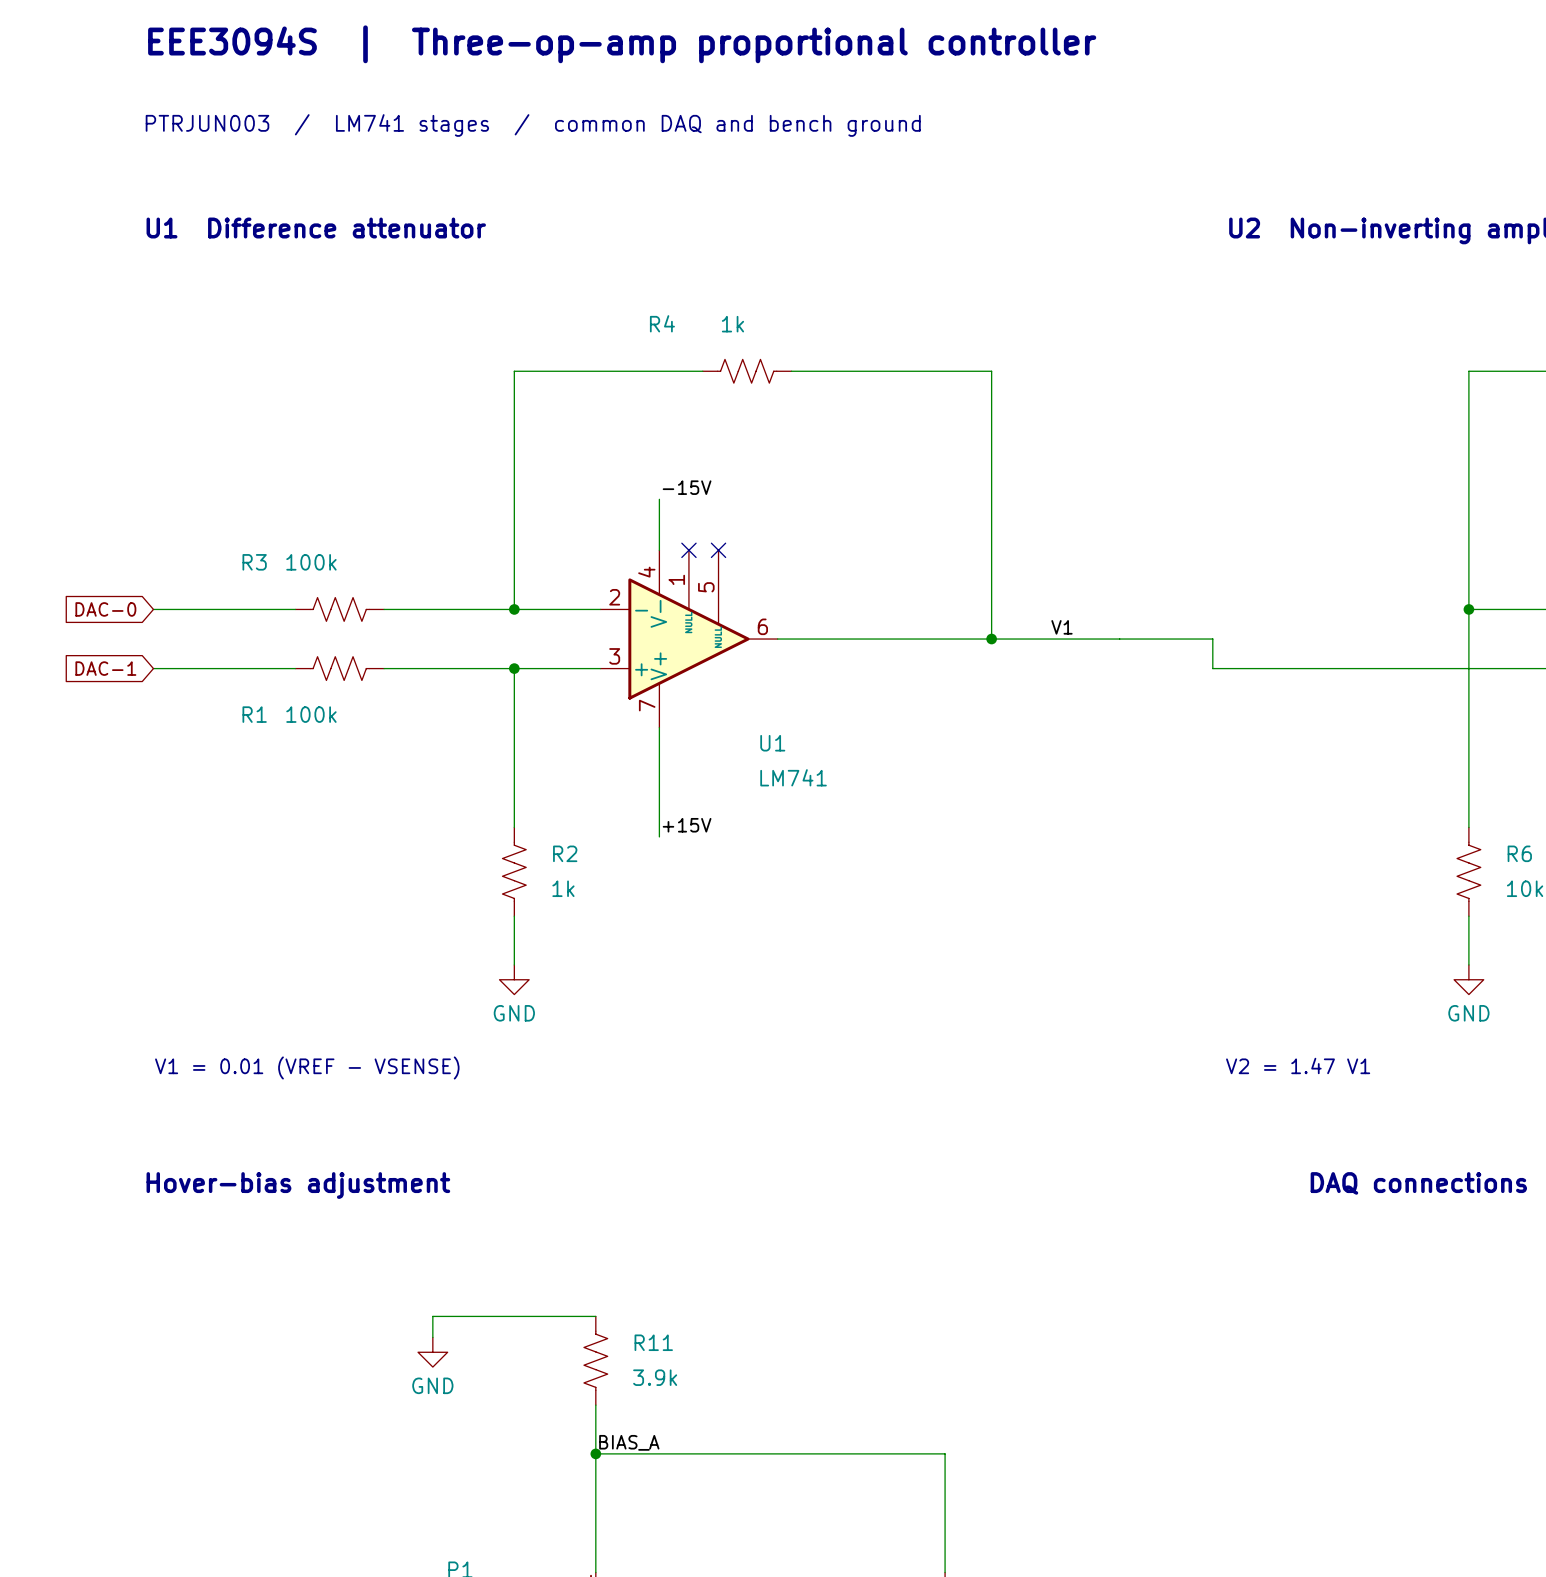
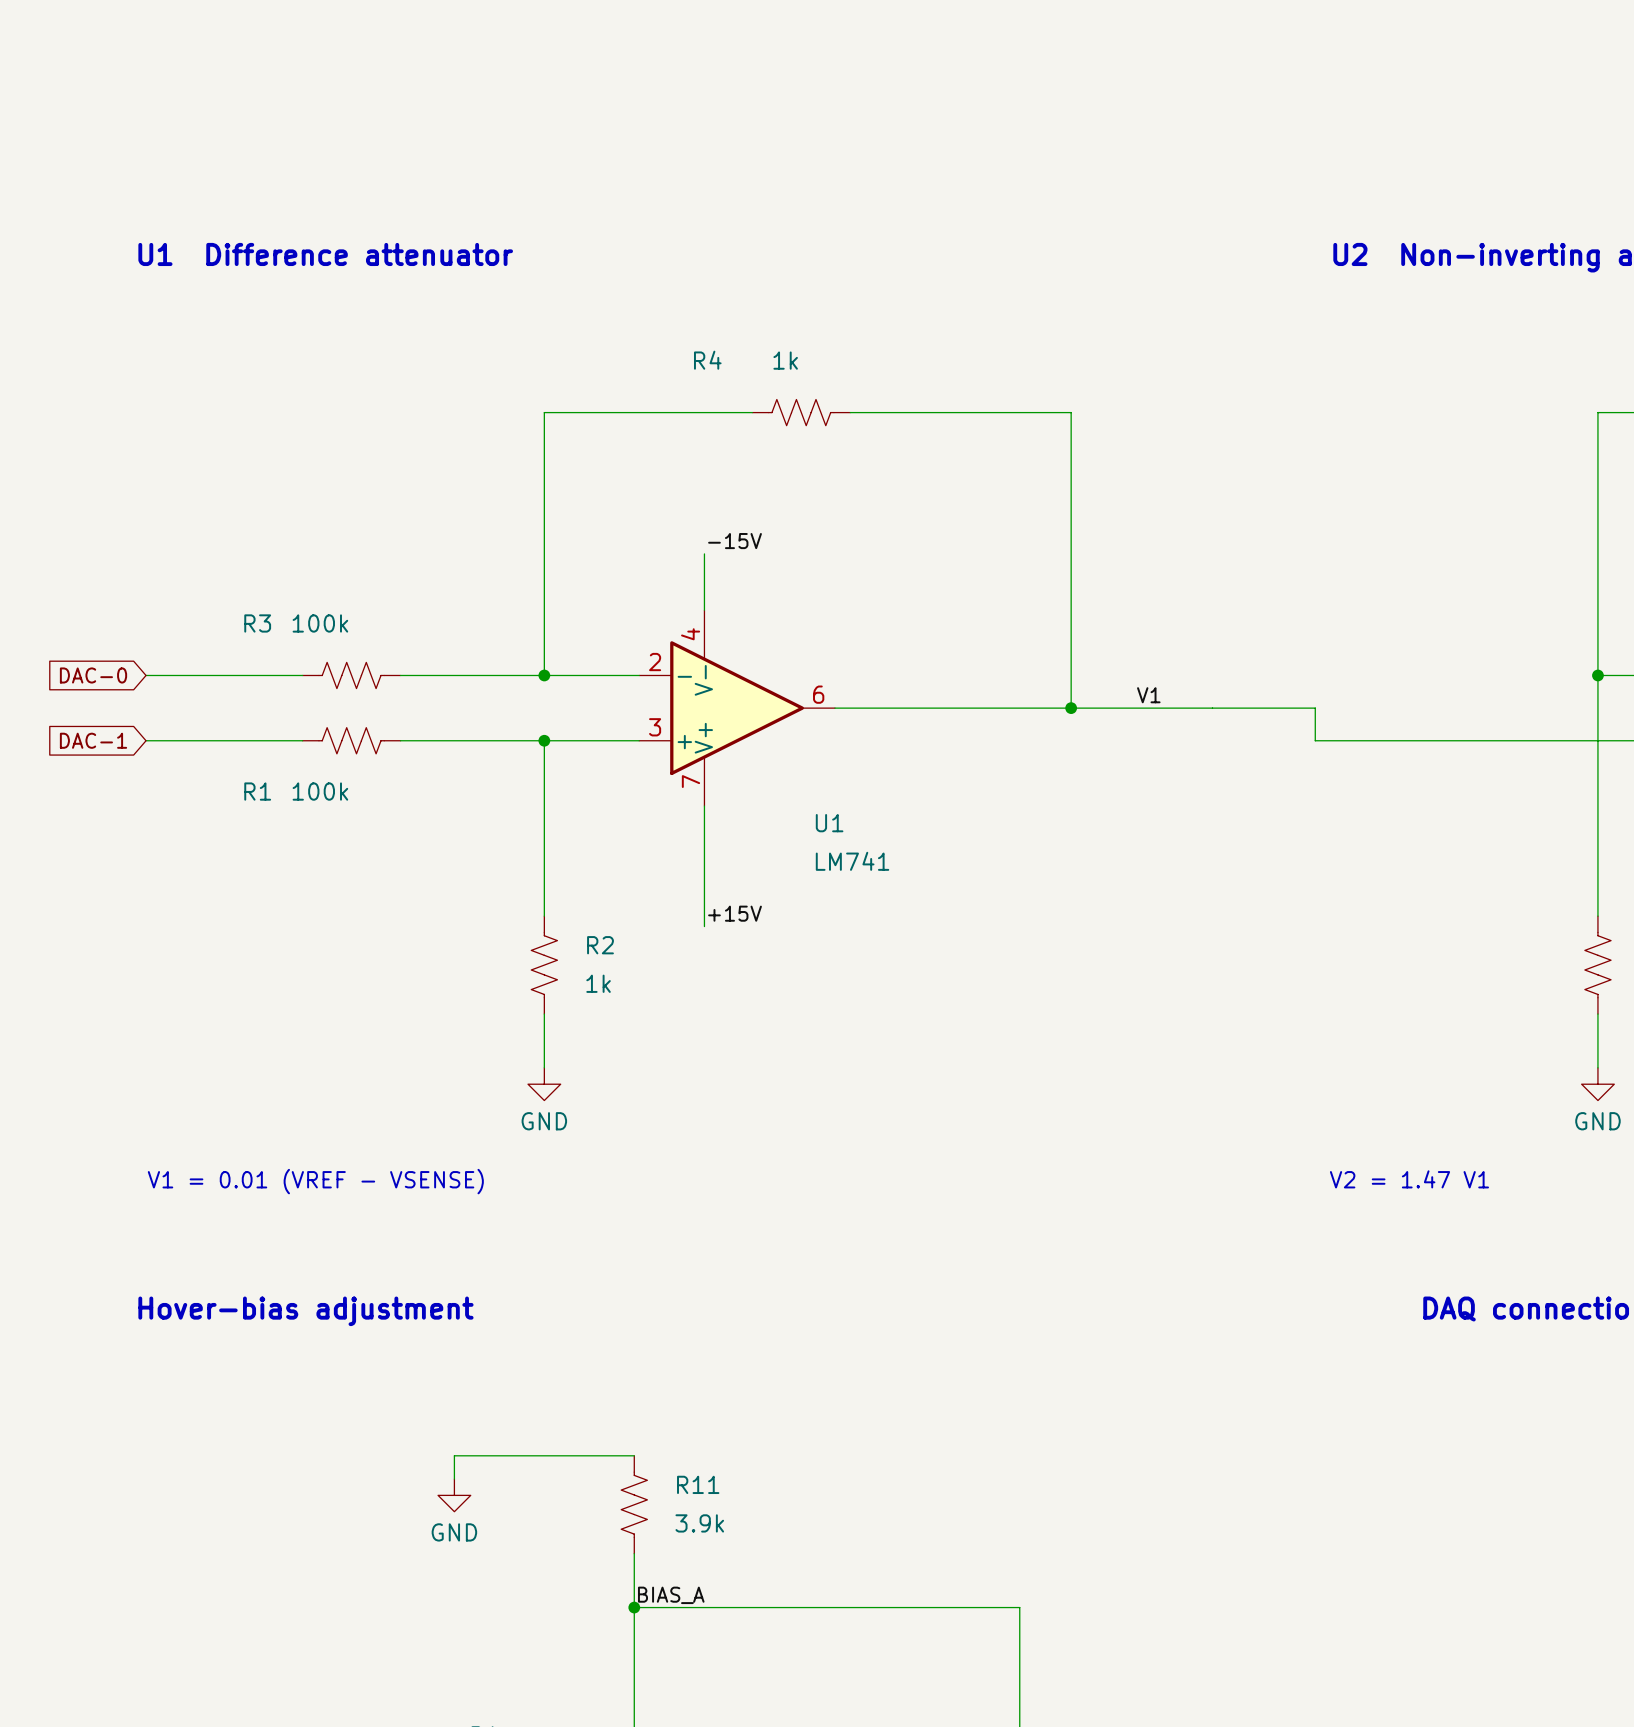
text: EEE3094S | Three-op-amp proportional controller (622, 44) -> none
text: PTRJUN003 / LM741 stages / common DAQ and bench ground (533, 125) -> none
U1 symbol: [600, 550, 778, 728] -> [639, 610, 835, 807]
no-connect mark: (688, 550) -> none
no-connect mark: (718, 550) -> none

